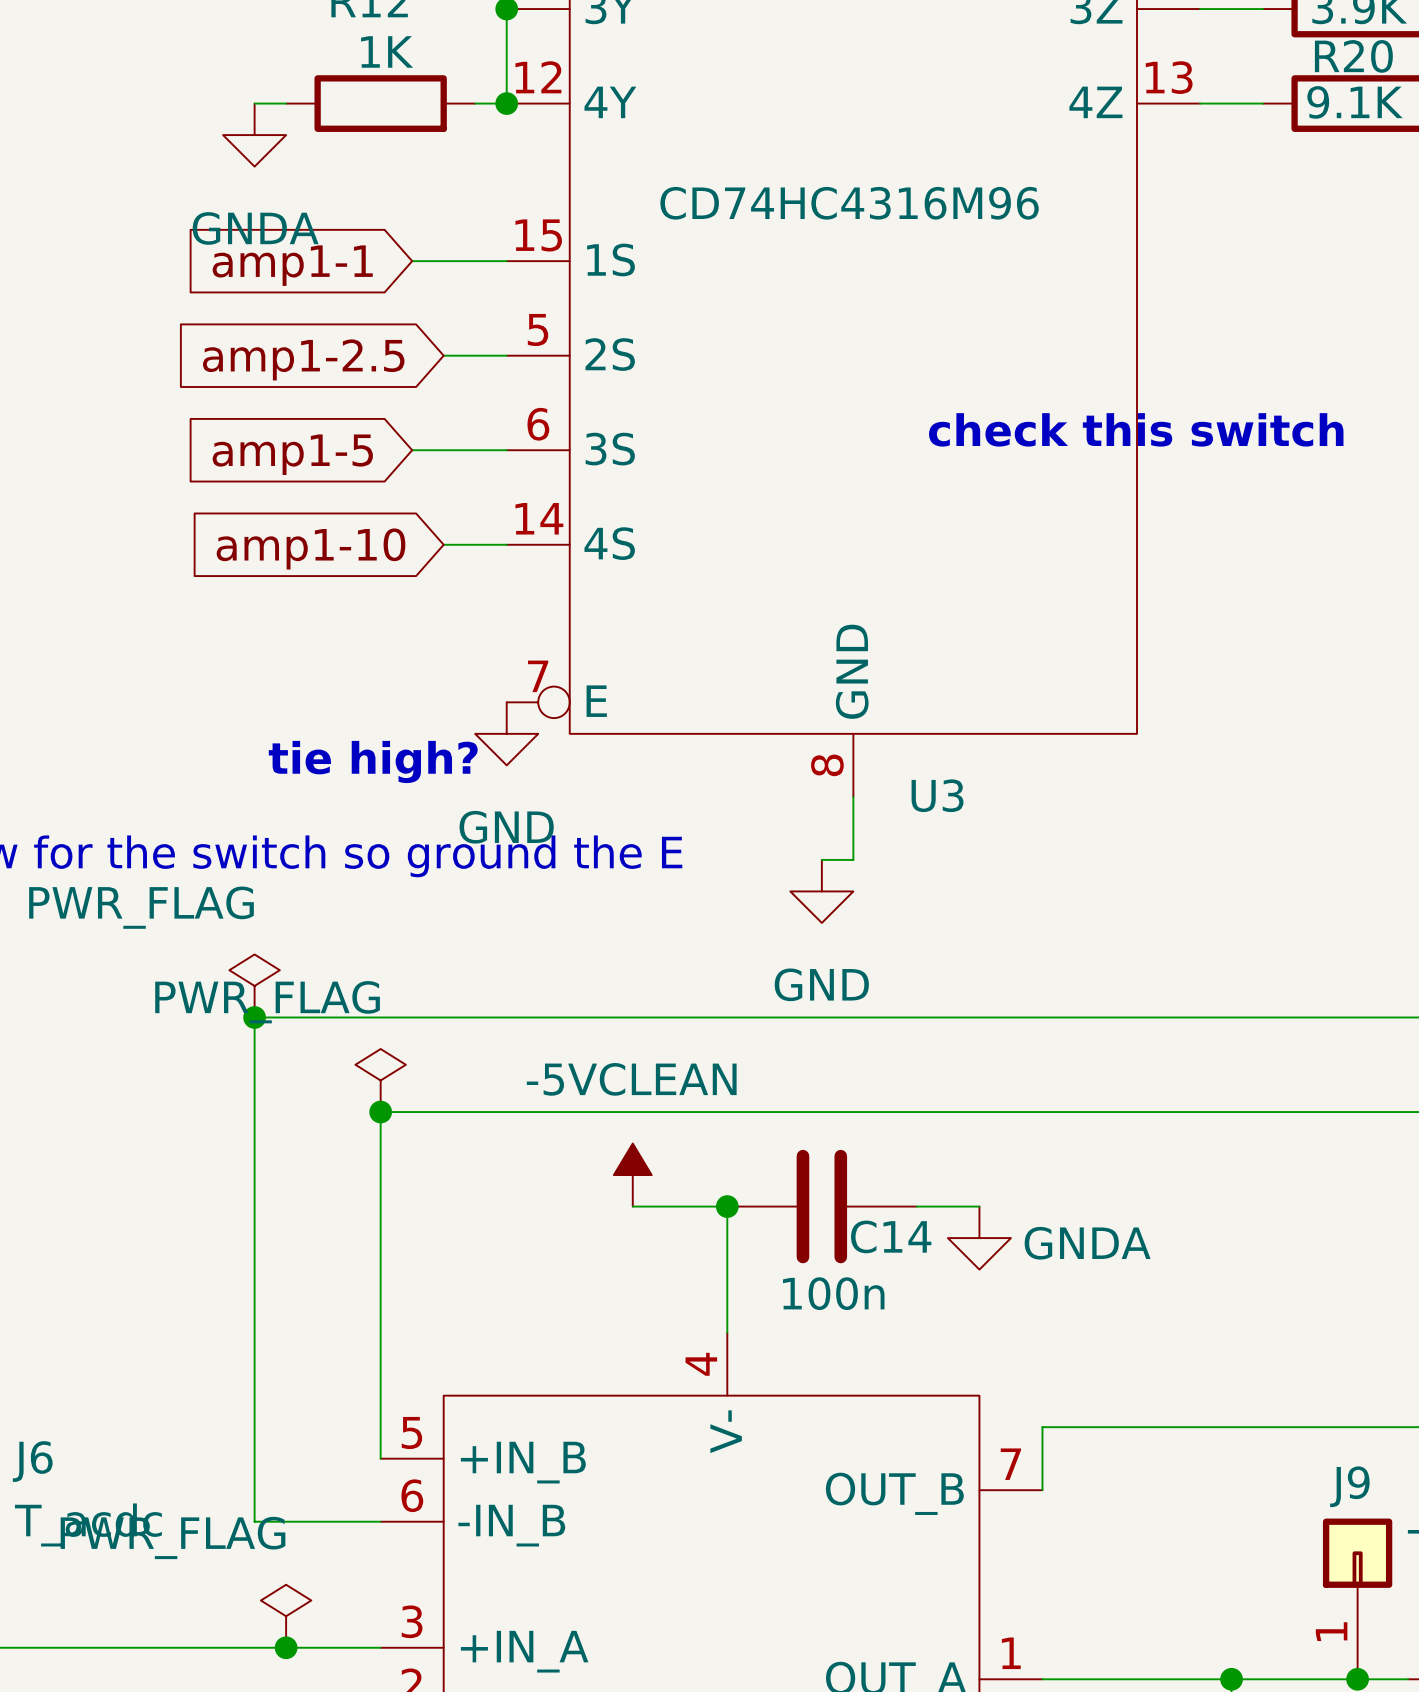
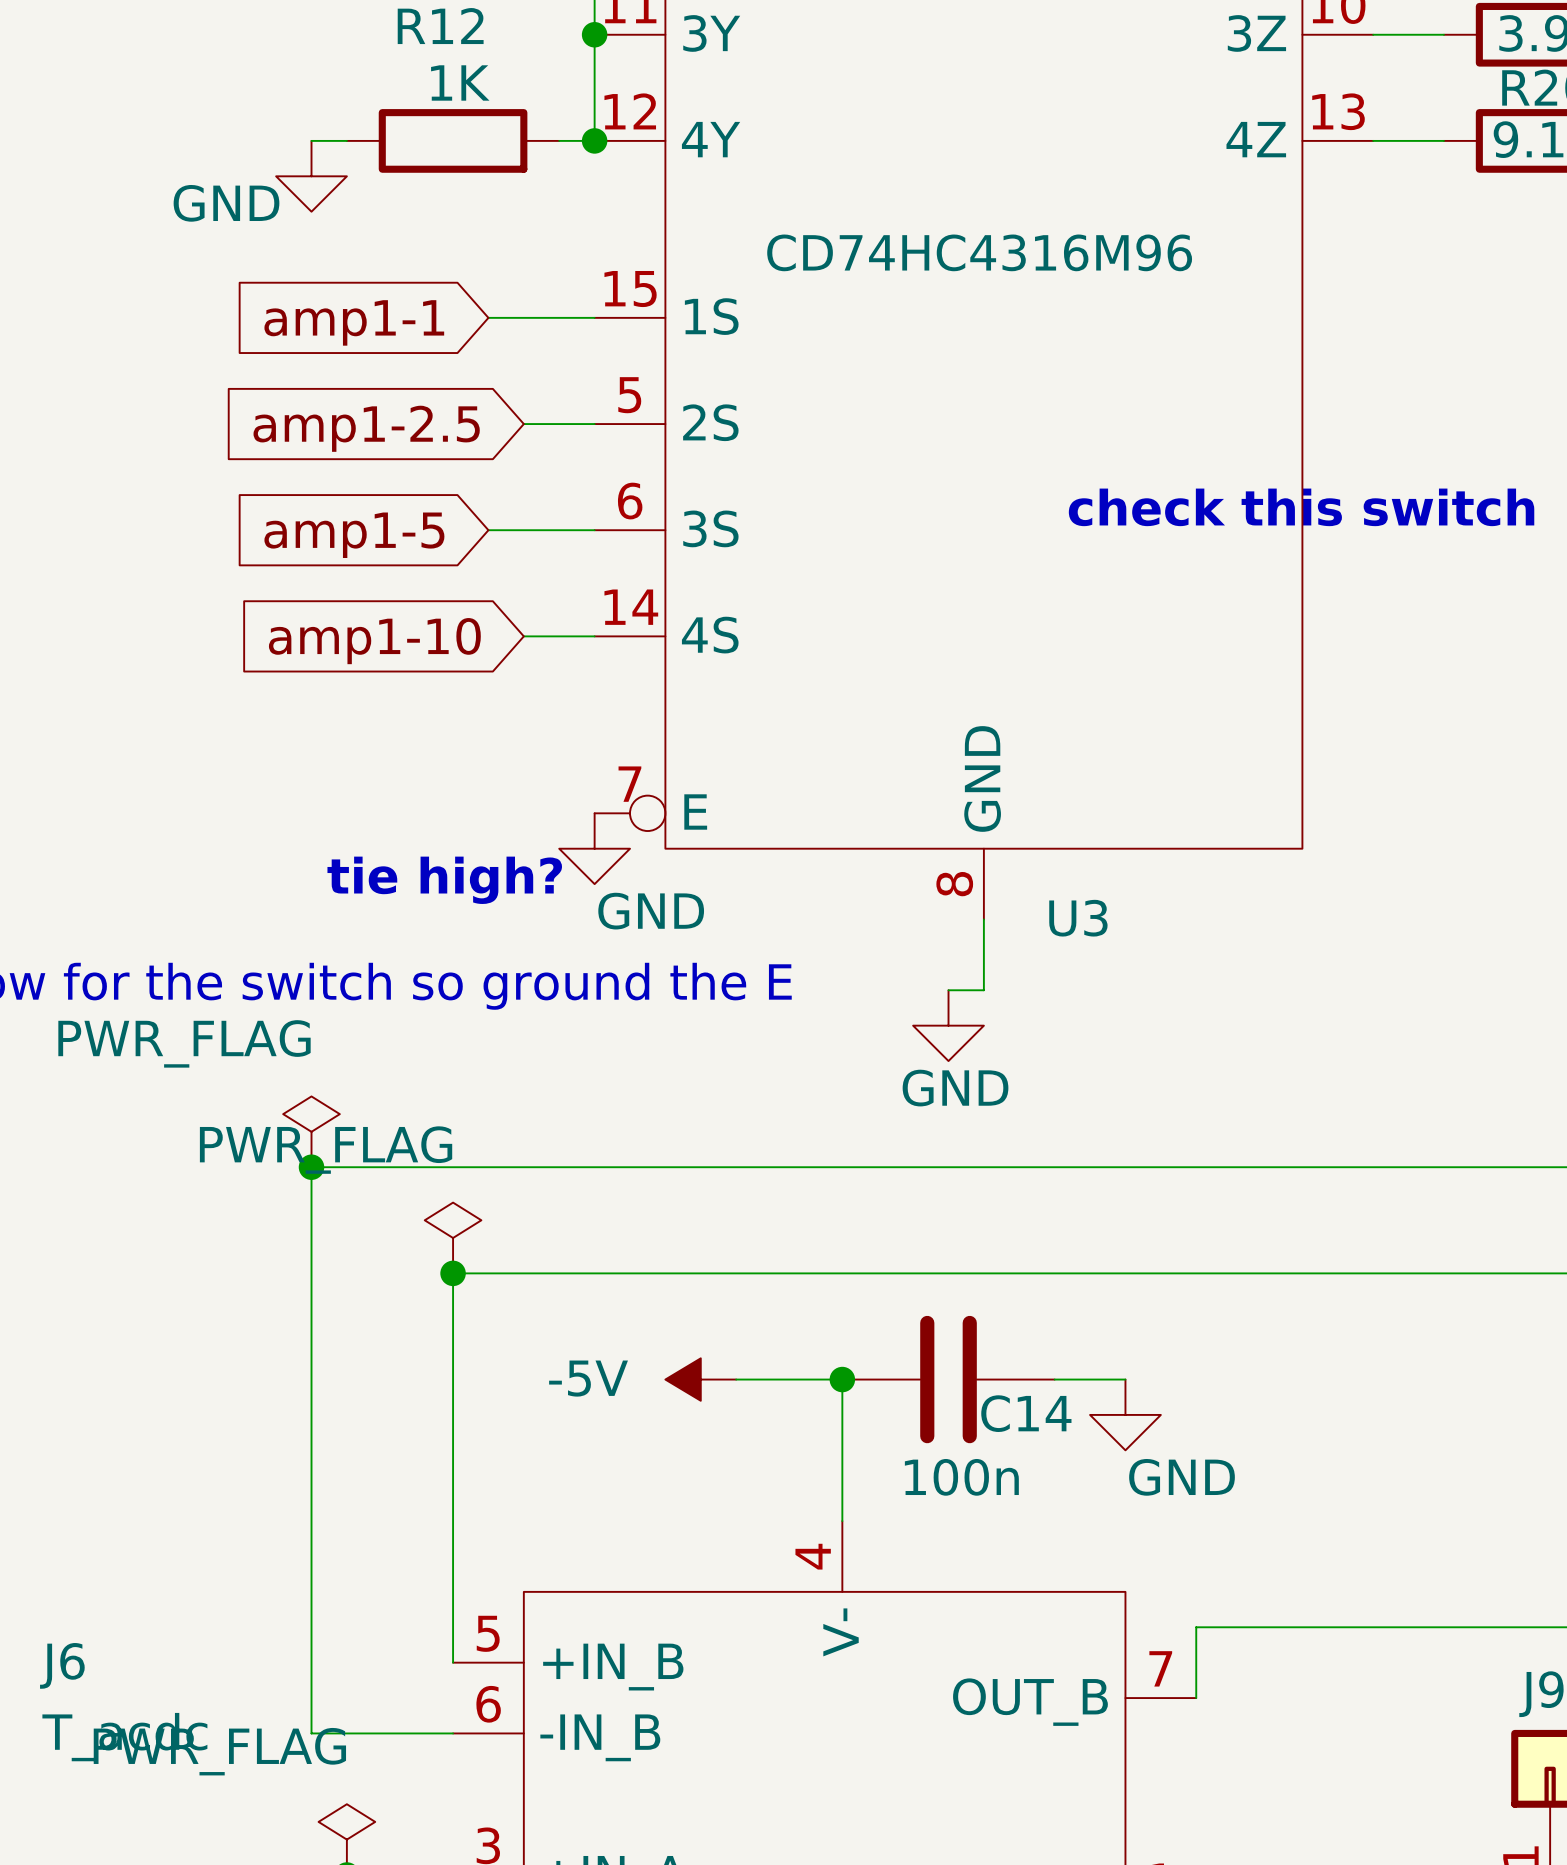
power symbol: GNDA (254, 135) -> GND (311, 176)
power symbol text position: GND (506, 827) -> GND (651, 911)
power symbol text position: GND (821, 984) -> GND (955, 1088)
power symbol: -5VCLEAN (632, 1175) -> none
power symbol: none -> -5V (700, 1379)
power symbol: GNDA (979, 1238) -> GND (1125, 1414)

